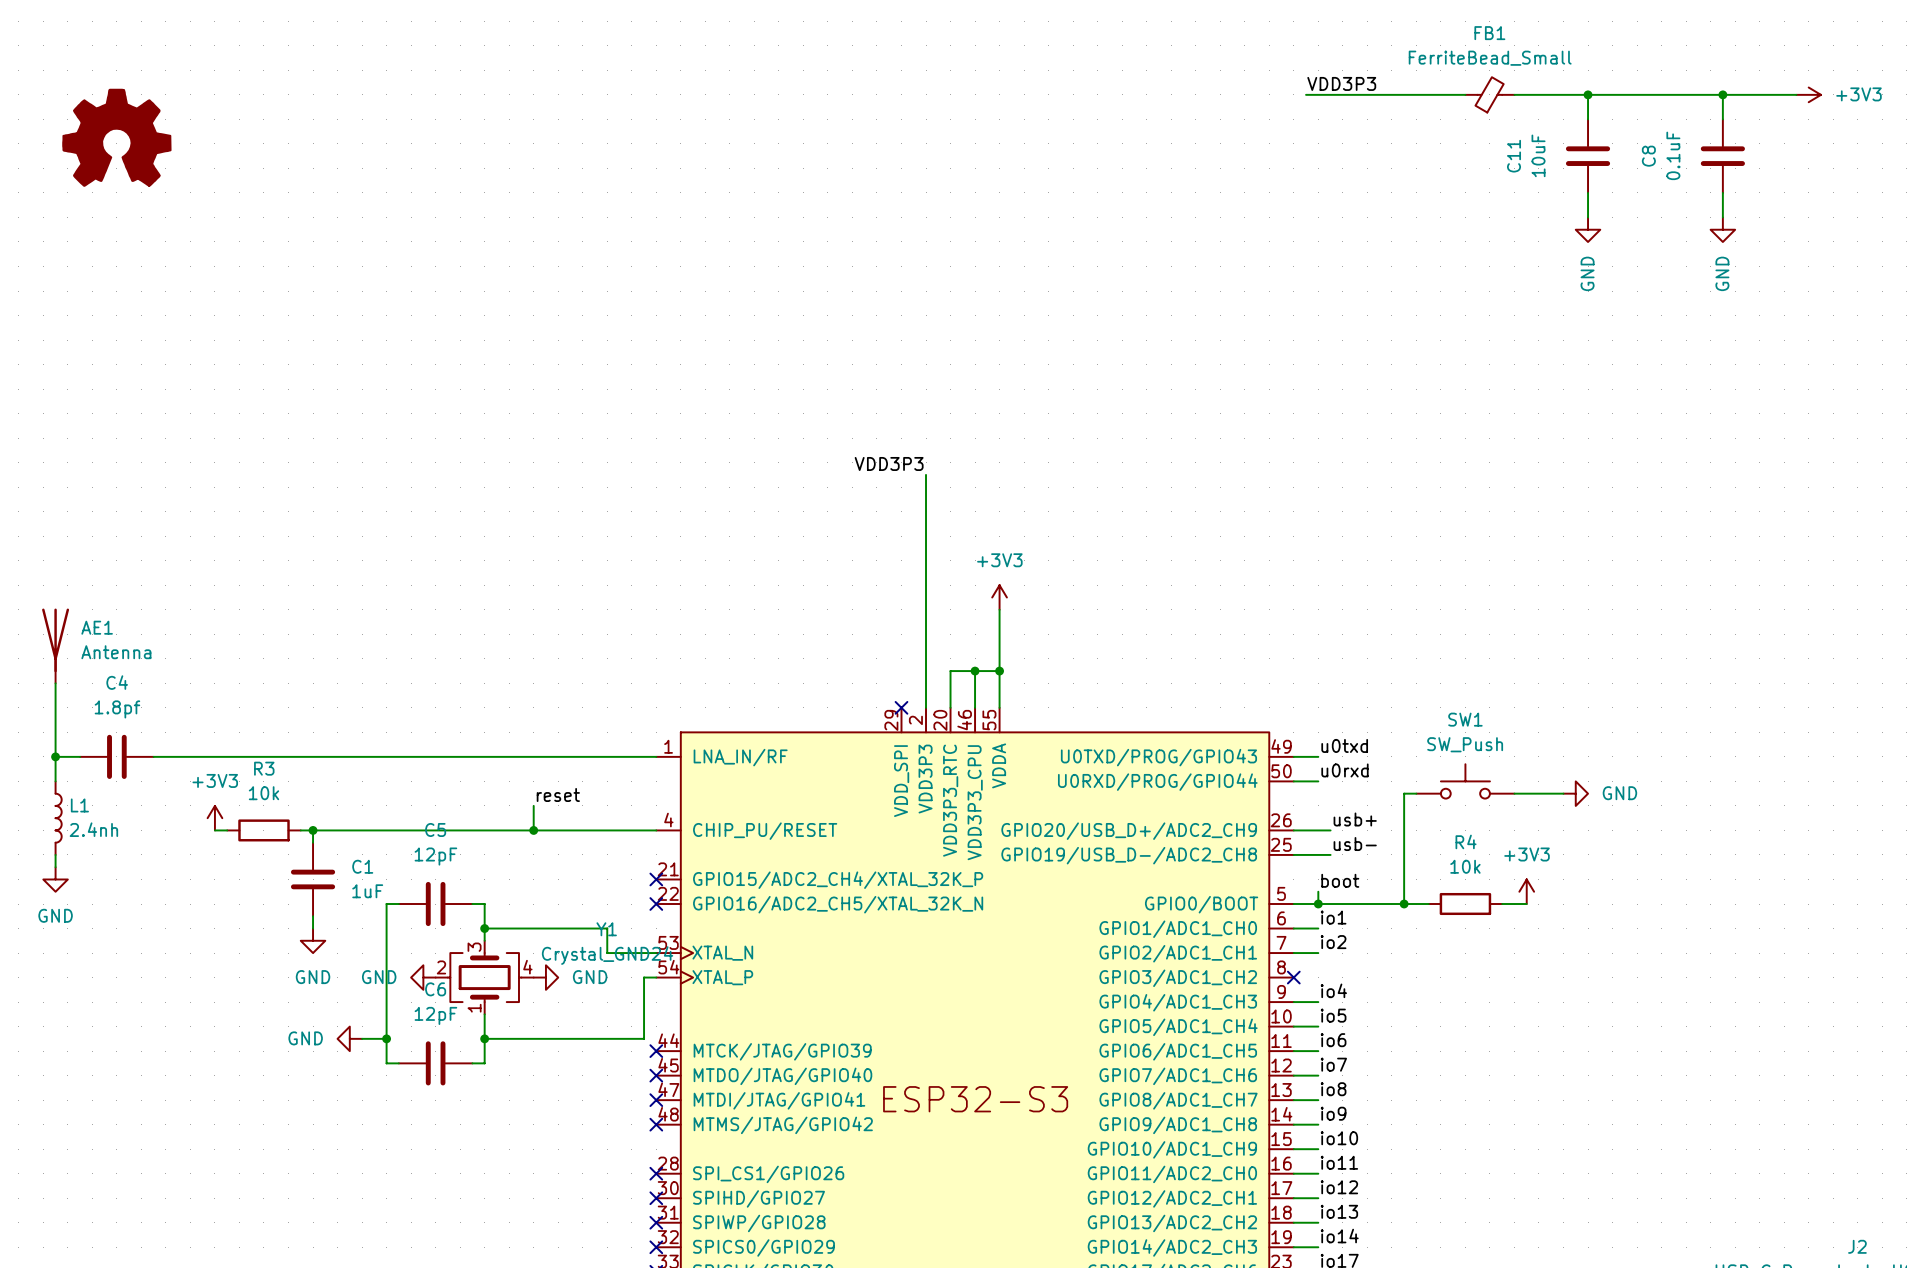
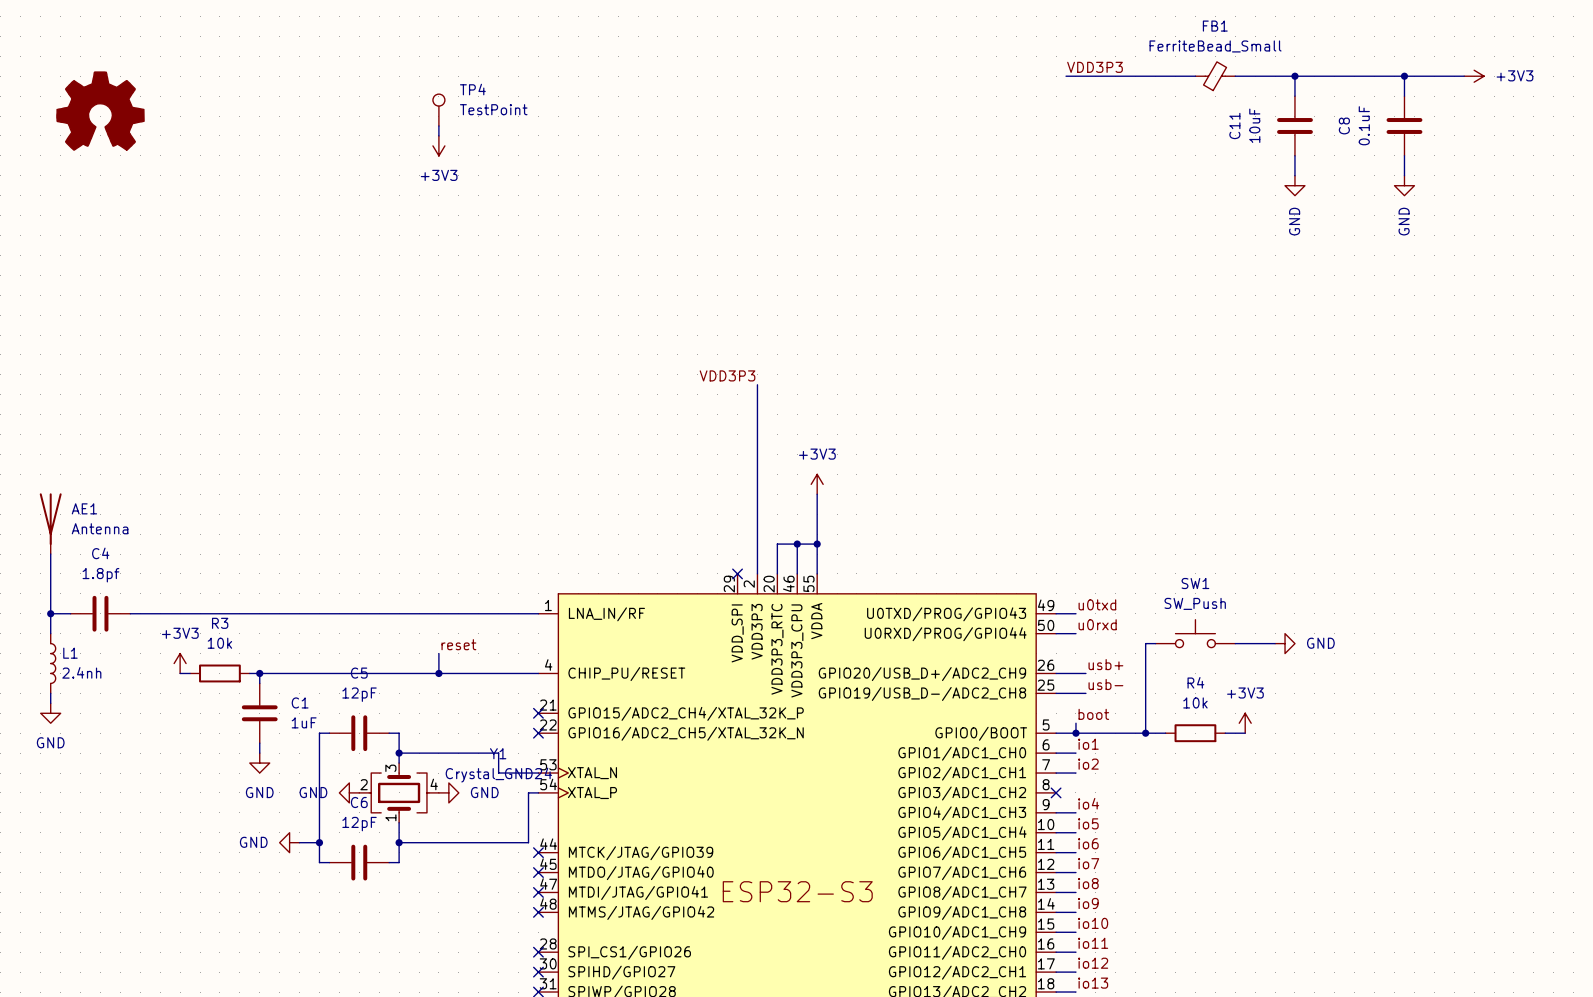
TP4: none -> TestPoint (438, 110)
wire: none -> (438, 125) (438, 135)
power symbol: none -> +3V3 (438, 145)

